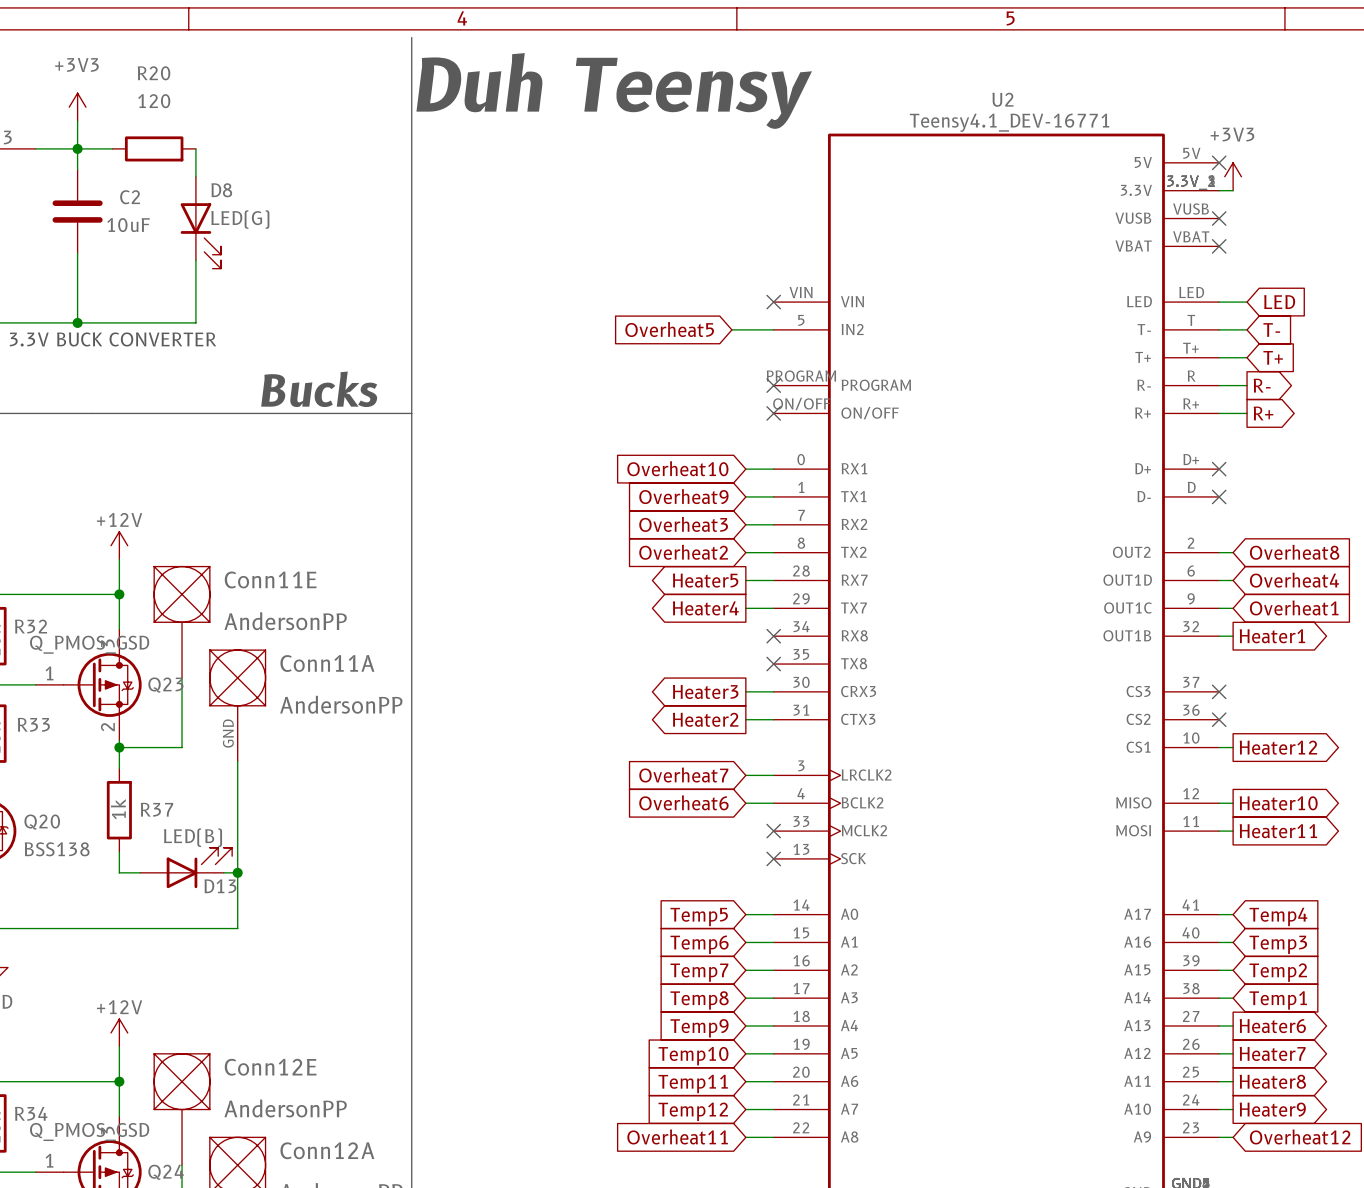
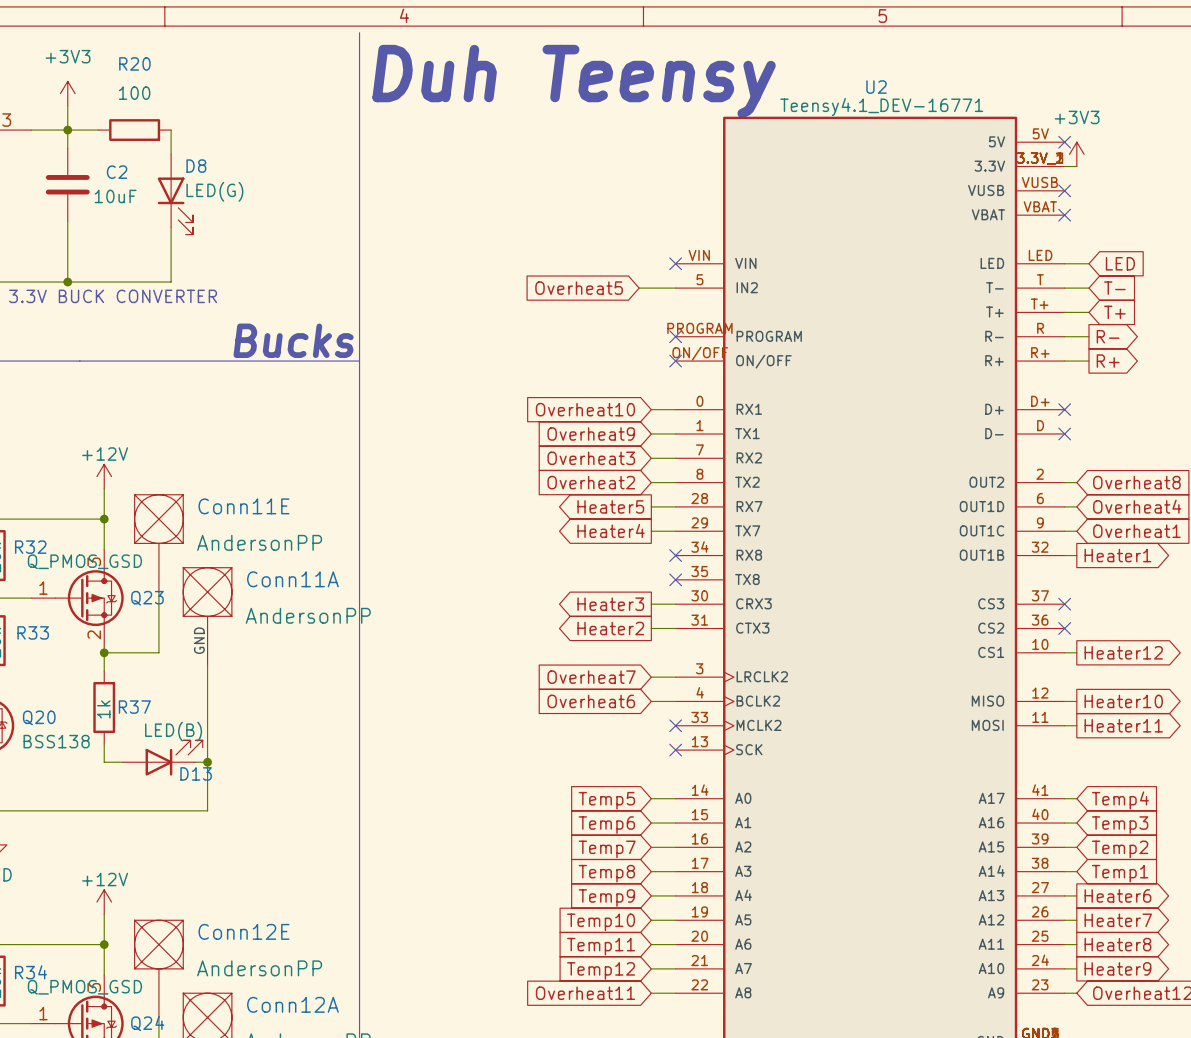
R20 value: 120 (154, 101) -> 100 (134, 93)

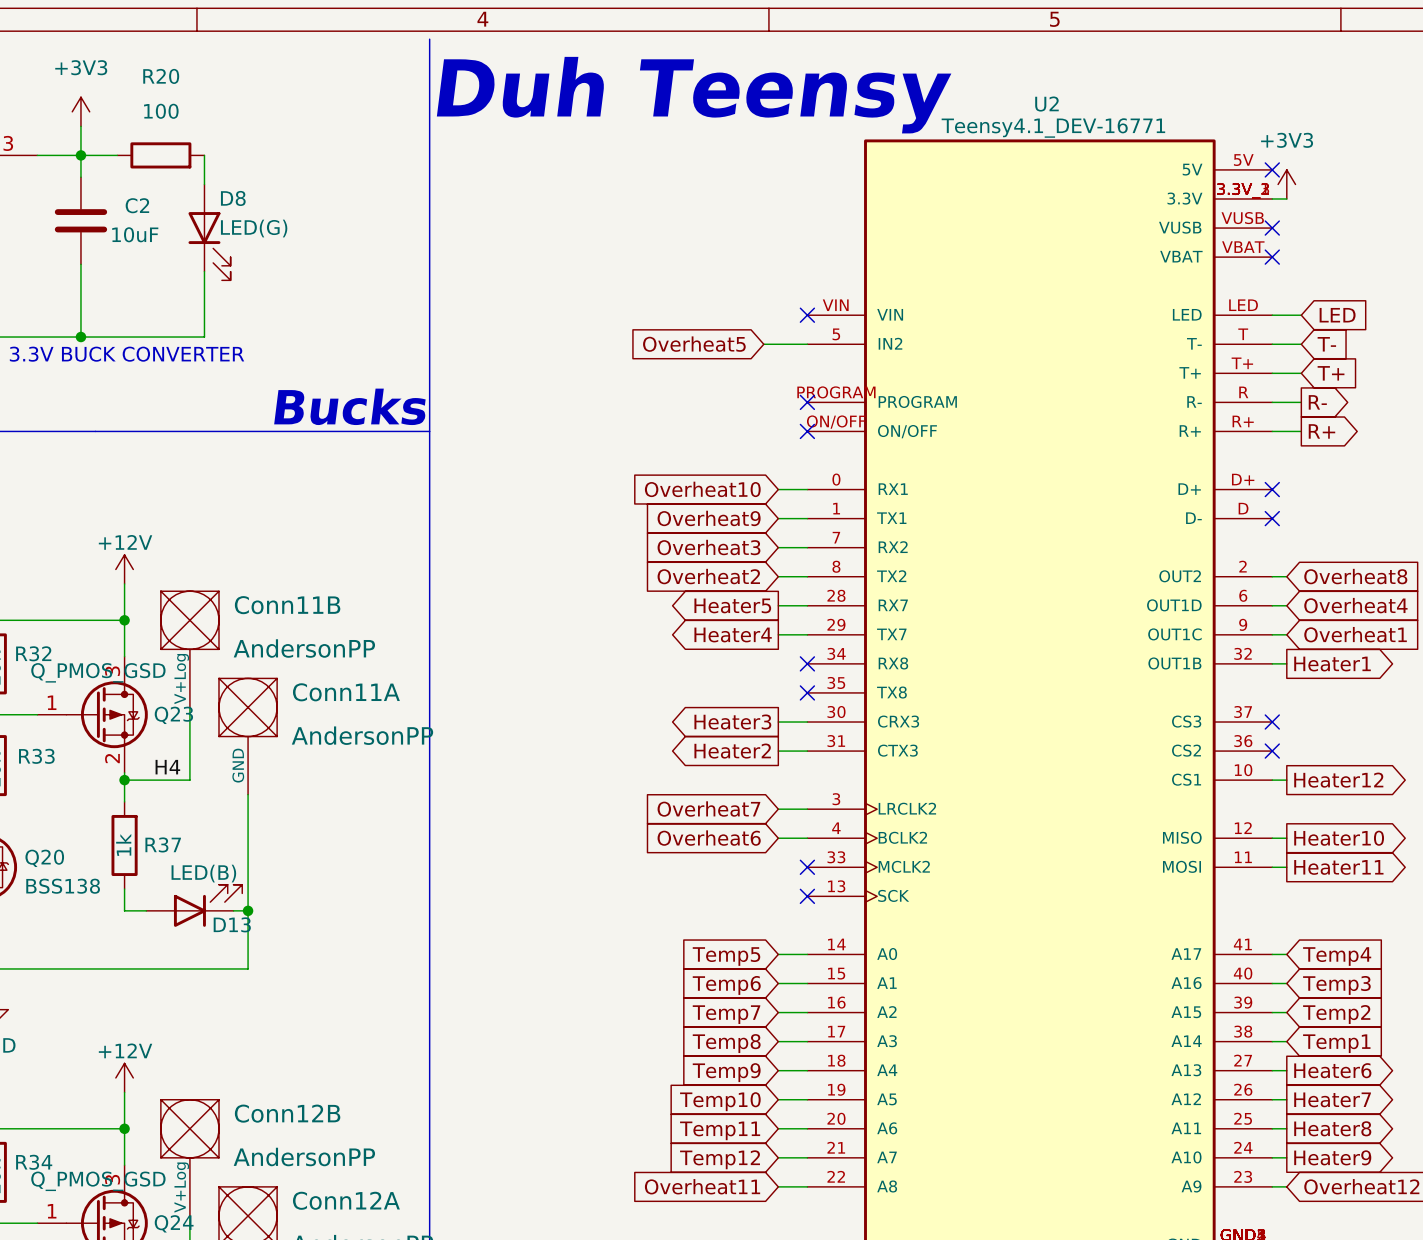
Conn11E name: Conn11E (243, 506) -> Conn11B (287, 605)
Conn11E pin name: none -> V+Log (181, 679)
label: none -> H4 (167, 767)
Conn12E name: Conn12E (243, 931) -> Conn12B (287, 1113)
Conn12E pin name: none -> V+Log (181, 1187)

